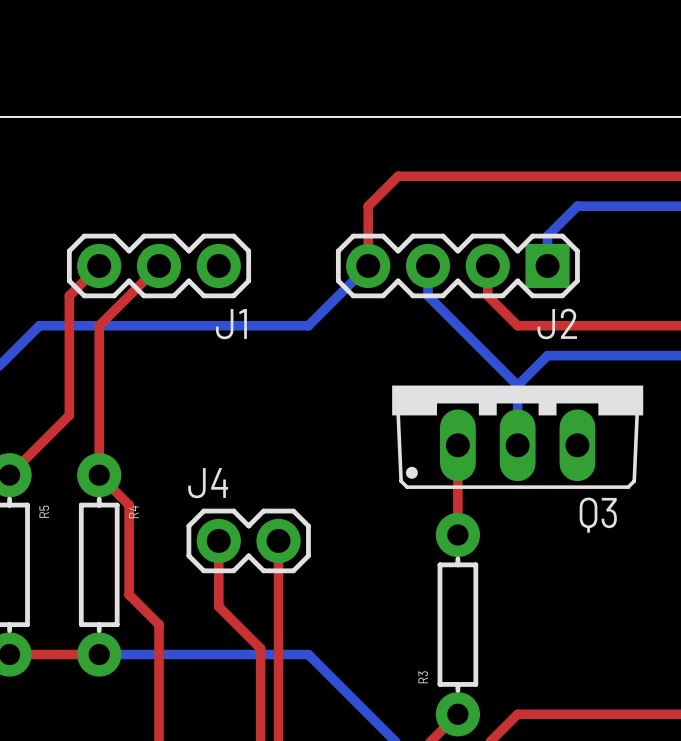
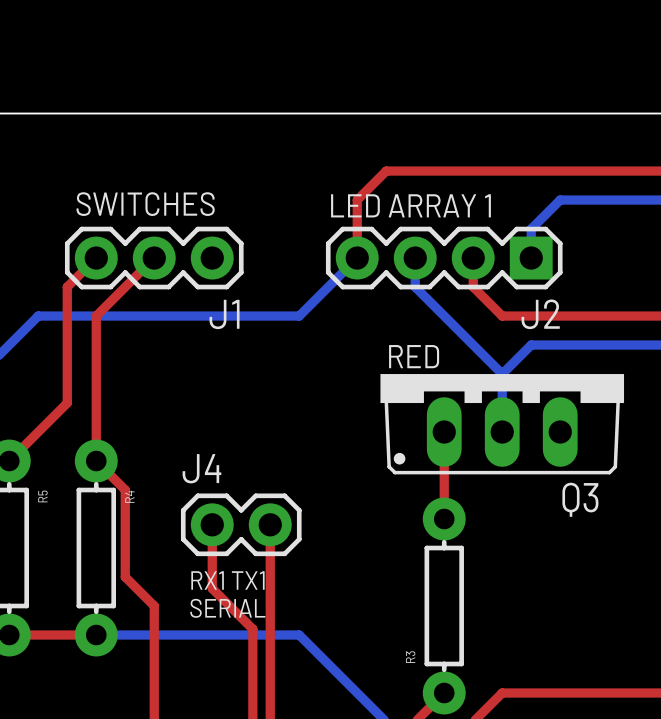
text: none -> SWITCHES (145, 204)
text: none -> LED ARRAY 1 (410, 205)
text: none -> RED (414, 356)
text: none -> RX1 TX1 (227, 580)
text: none -> SERIAL (227, 608)

